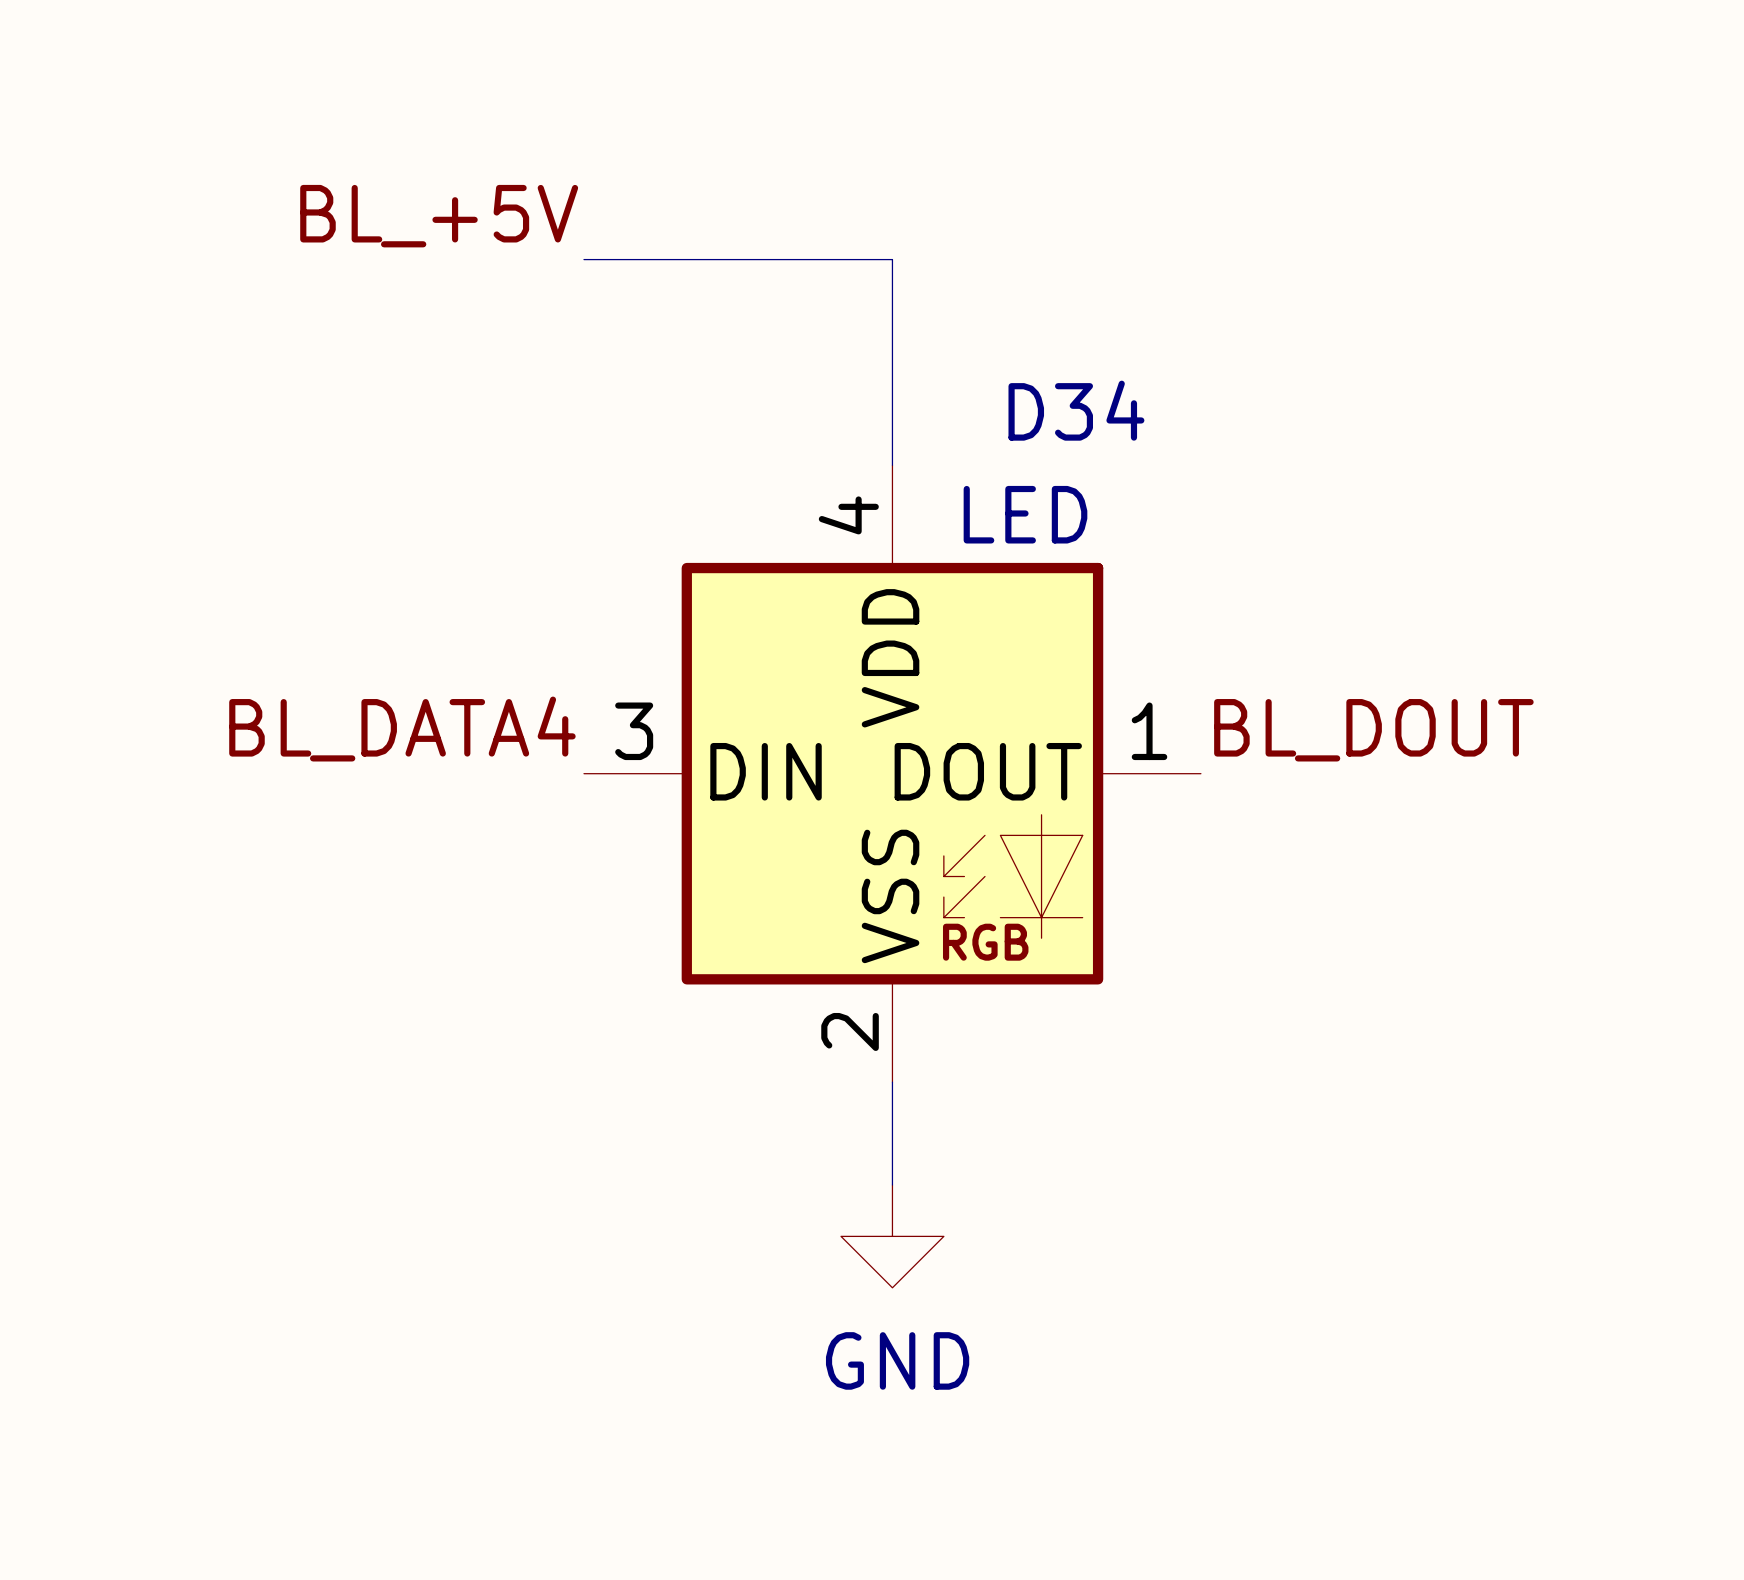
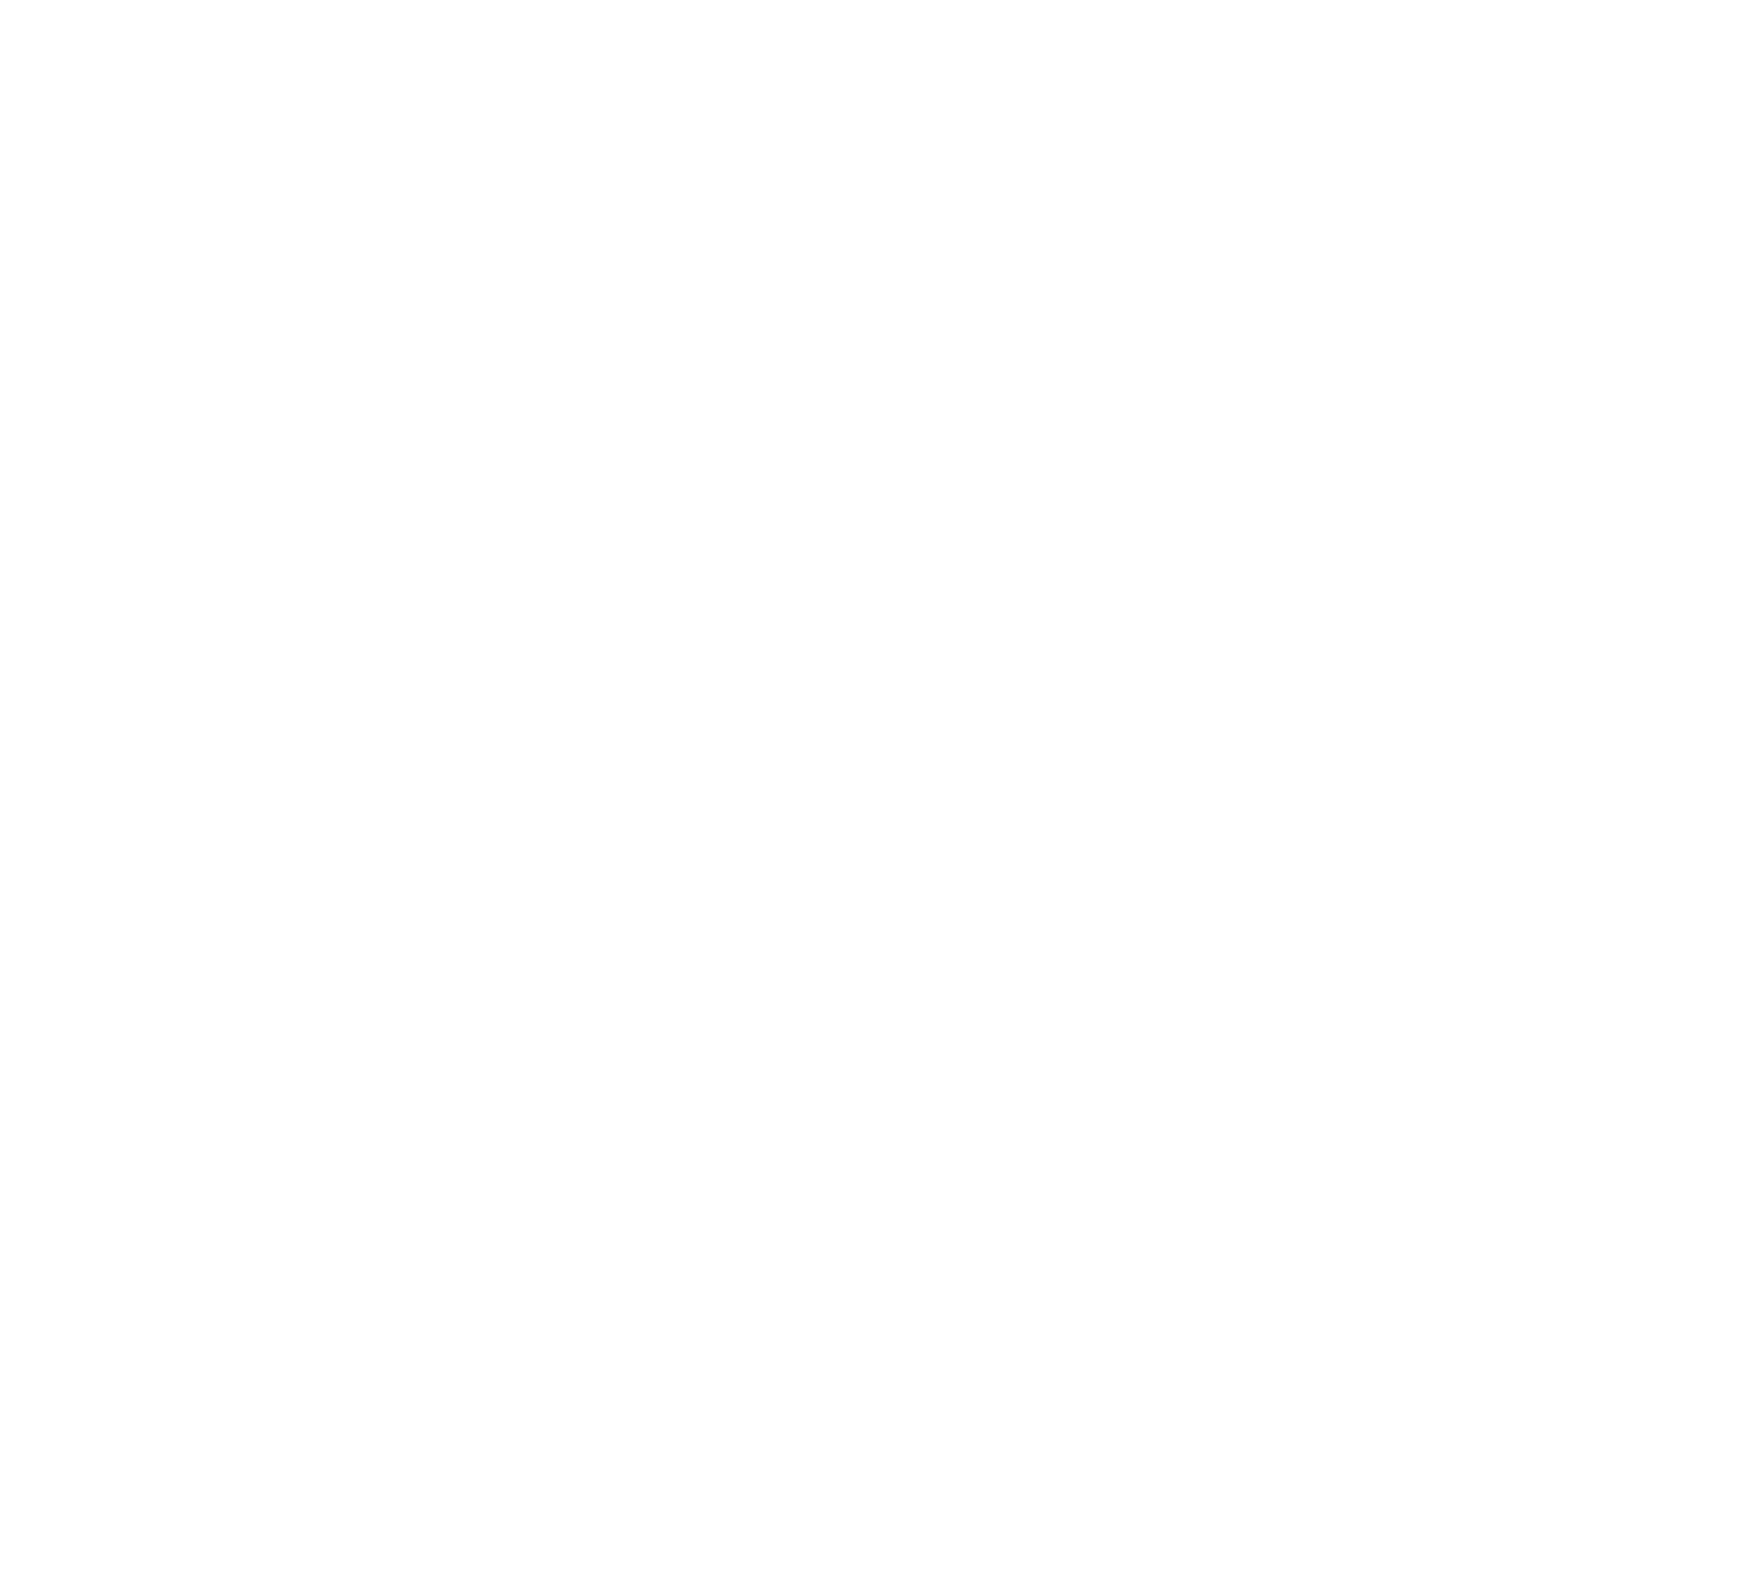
label: BL_+5V (439, 216) -> none
wire: (583, 259) (892, 259) (892, 465) -> none
label: BL_DATA4 (402, 729) -> none
label: BL_DOUT (1373, 730) -> none
D34: LED (892, 773) -> none
wire: (892, 1082) (892, 1184) -> none
power symbol: GND (892, 1236) -> none

